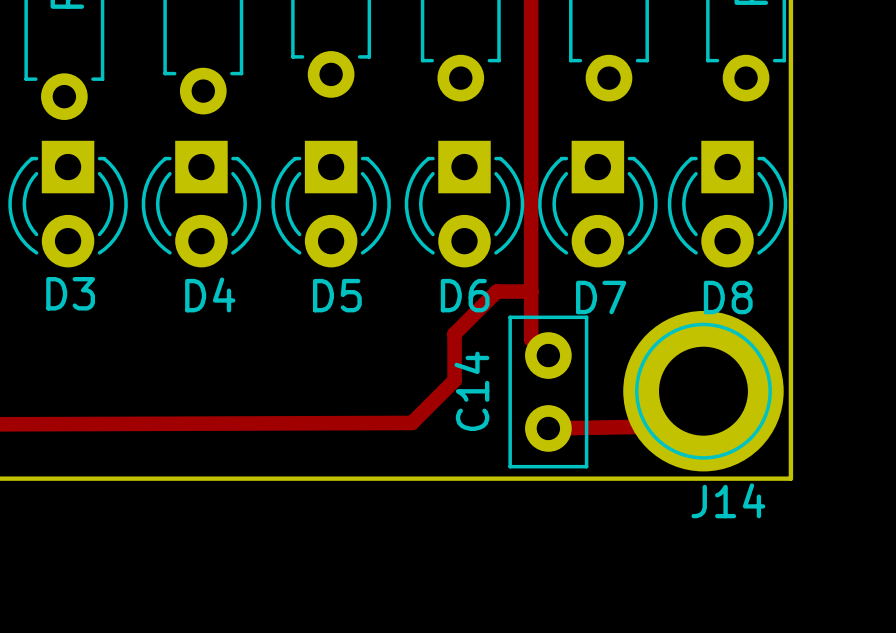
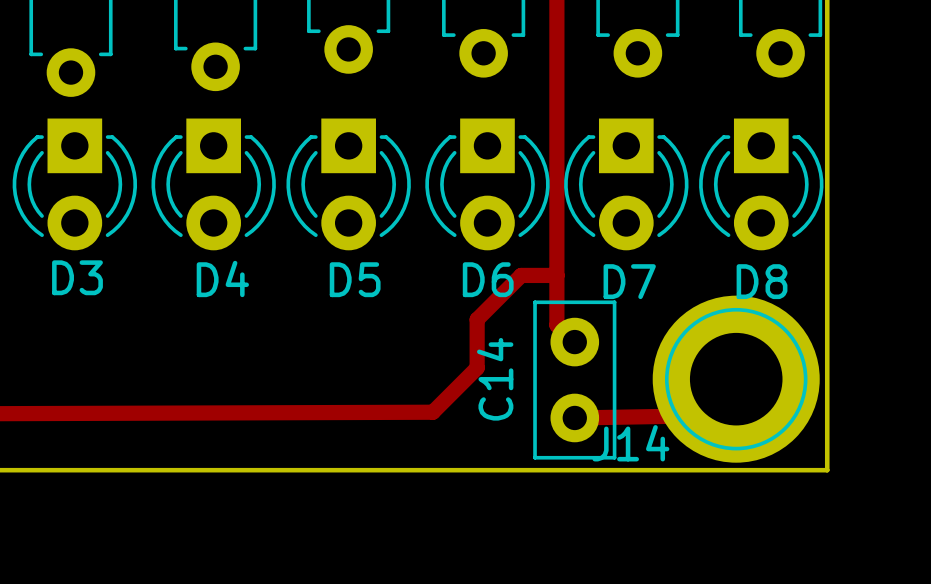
J14 name position: J14 (728, 500) -> J14 (630, 443)

